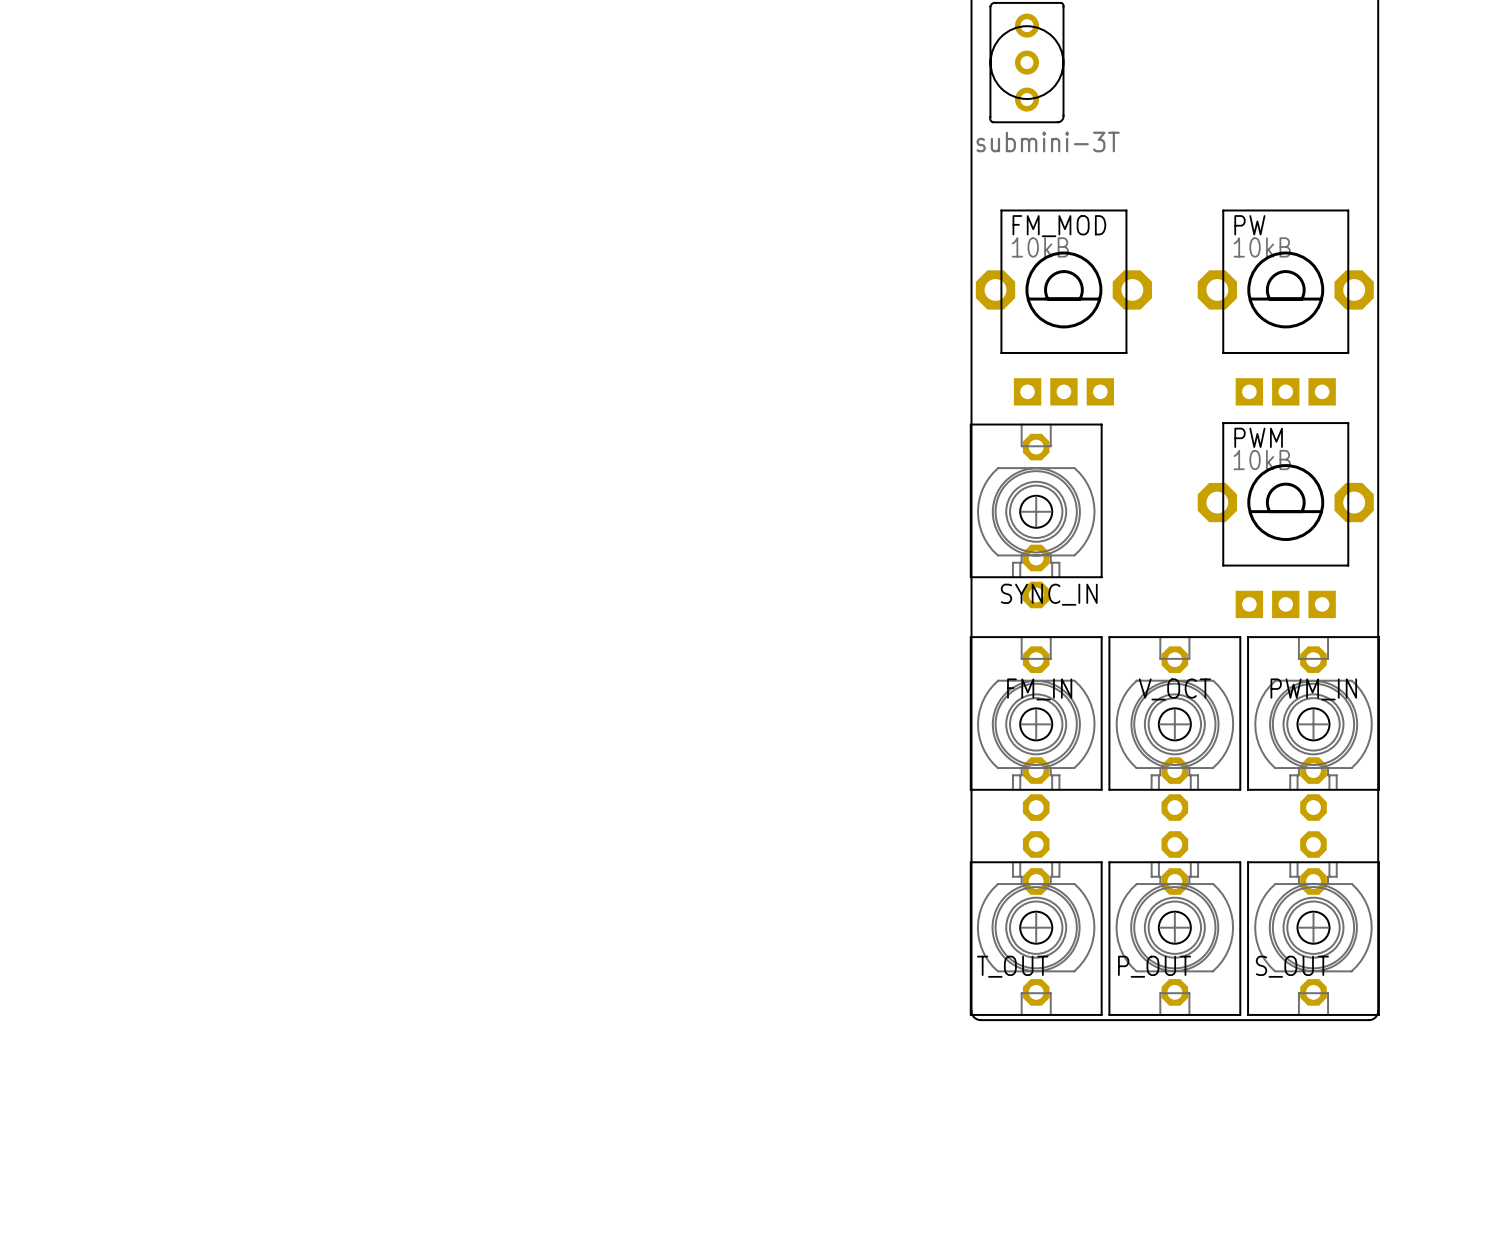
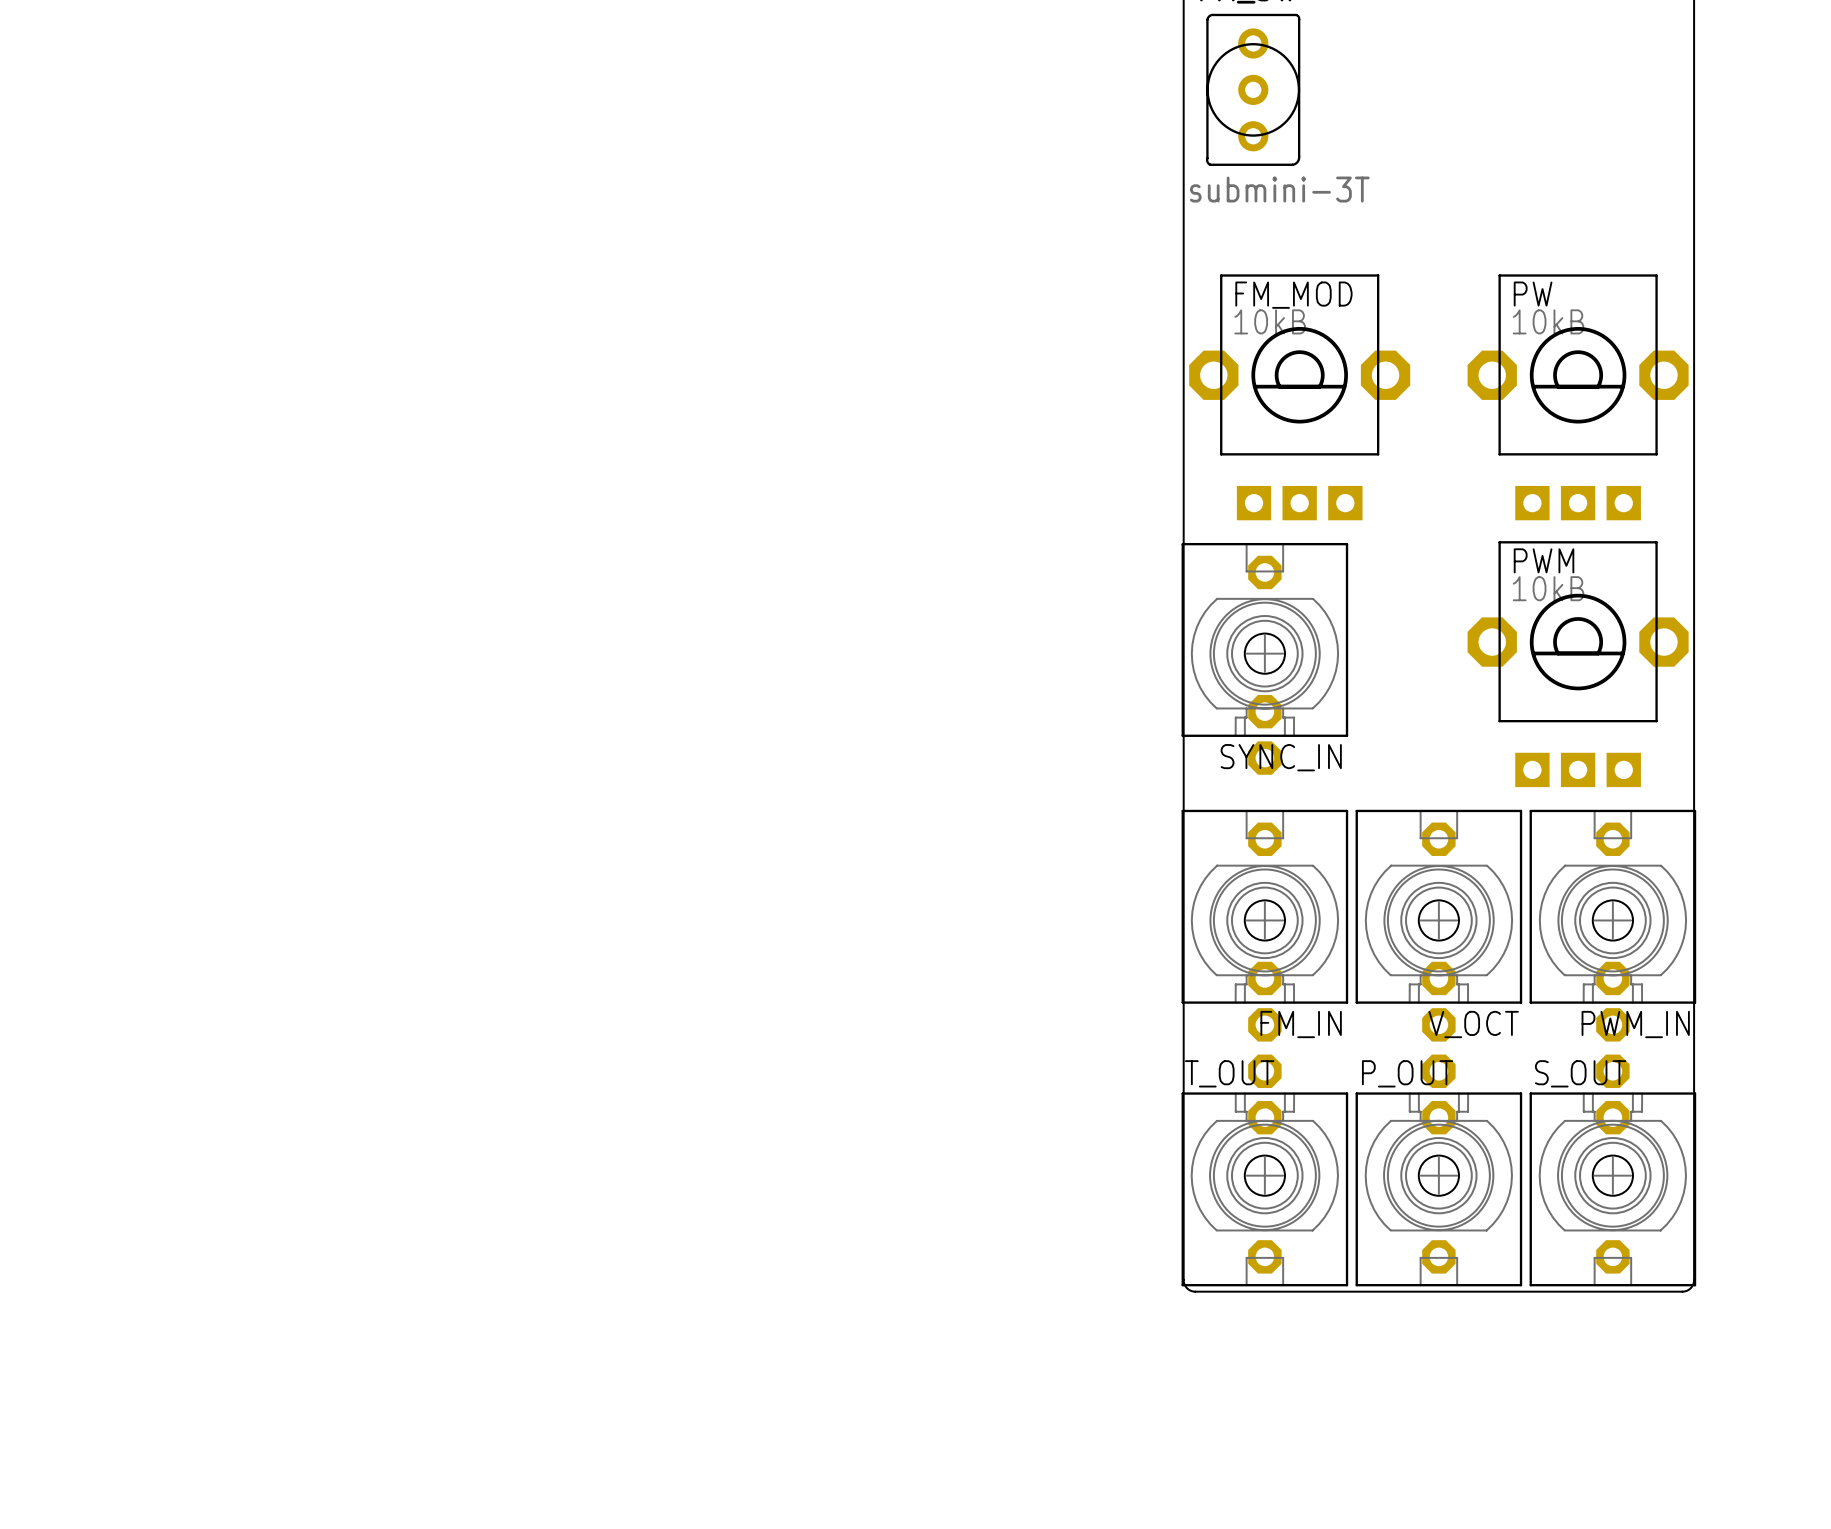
FM_IN name position: FM_IN (1039, 689) -> FM_IN (1301, 1024)
V_OCT name position: V_OCT (1174, 689) -> V_OCT (1473, 1024)
PWM_IN name position: PWM_IN (1313, 689) -> PWM_IN (1635, 1024)
T_OUT name position: T_OUT (1012, 966) -> T_OUT (1229, 1073)
P_OUT name position: P_OUT (1154, 966) -> P_OUT (1407, 1073)
S_OUT name position: S_OUT (1292, 966) -> S_OUT (1580, 1073)

